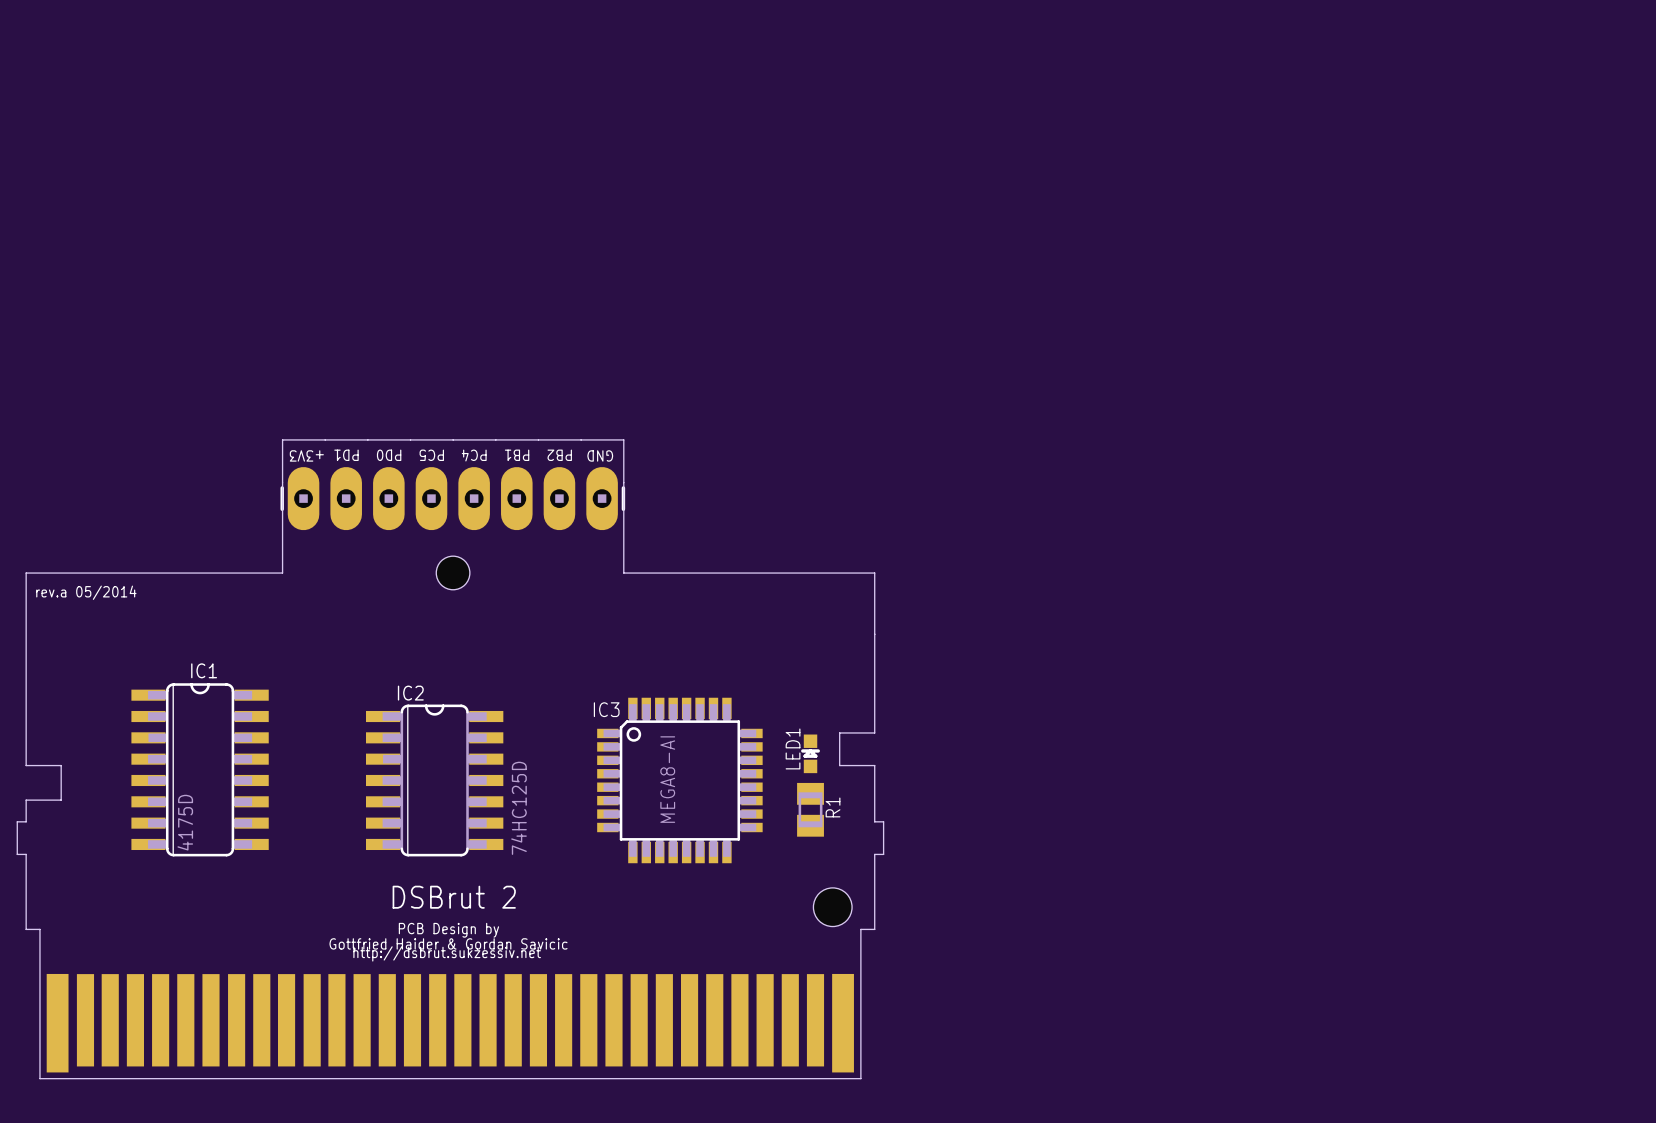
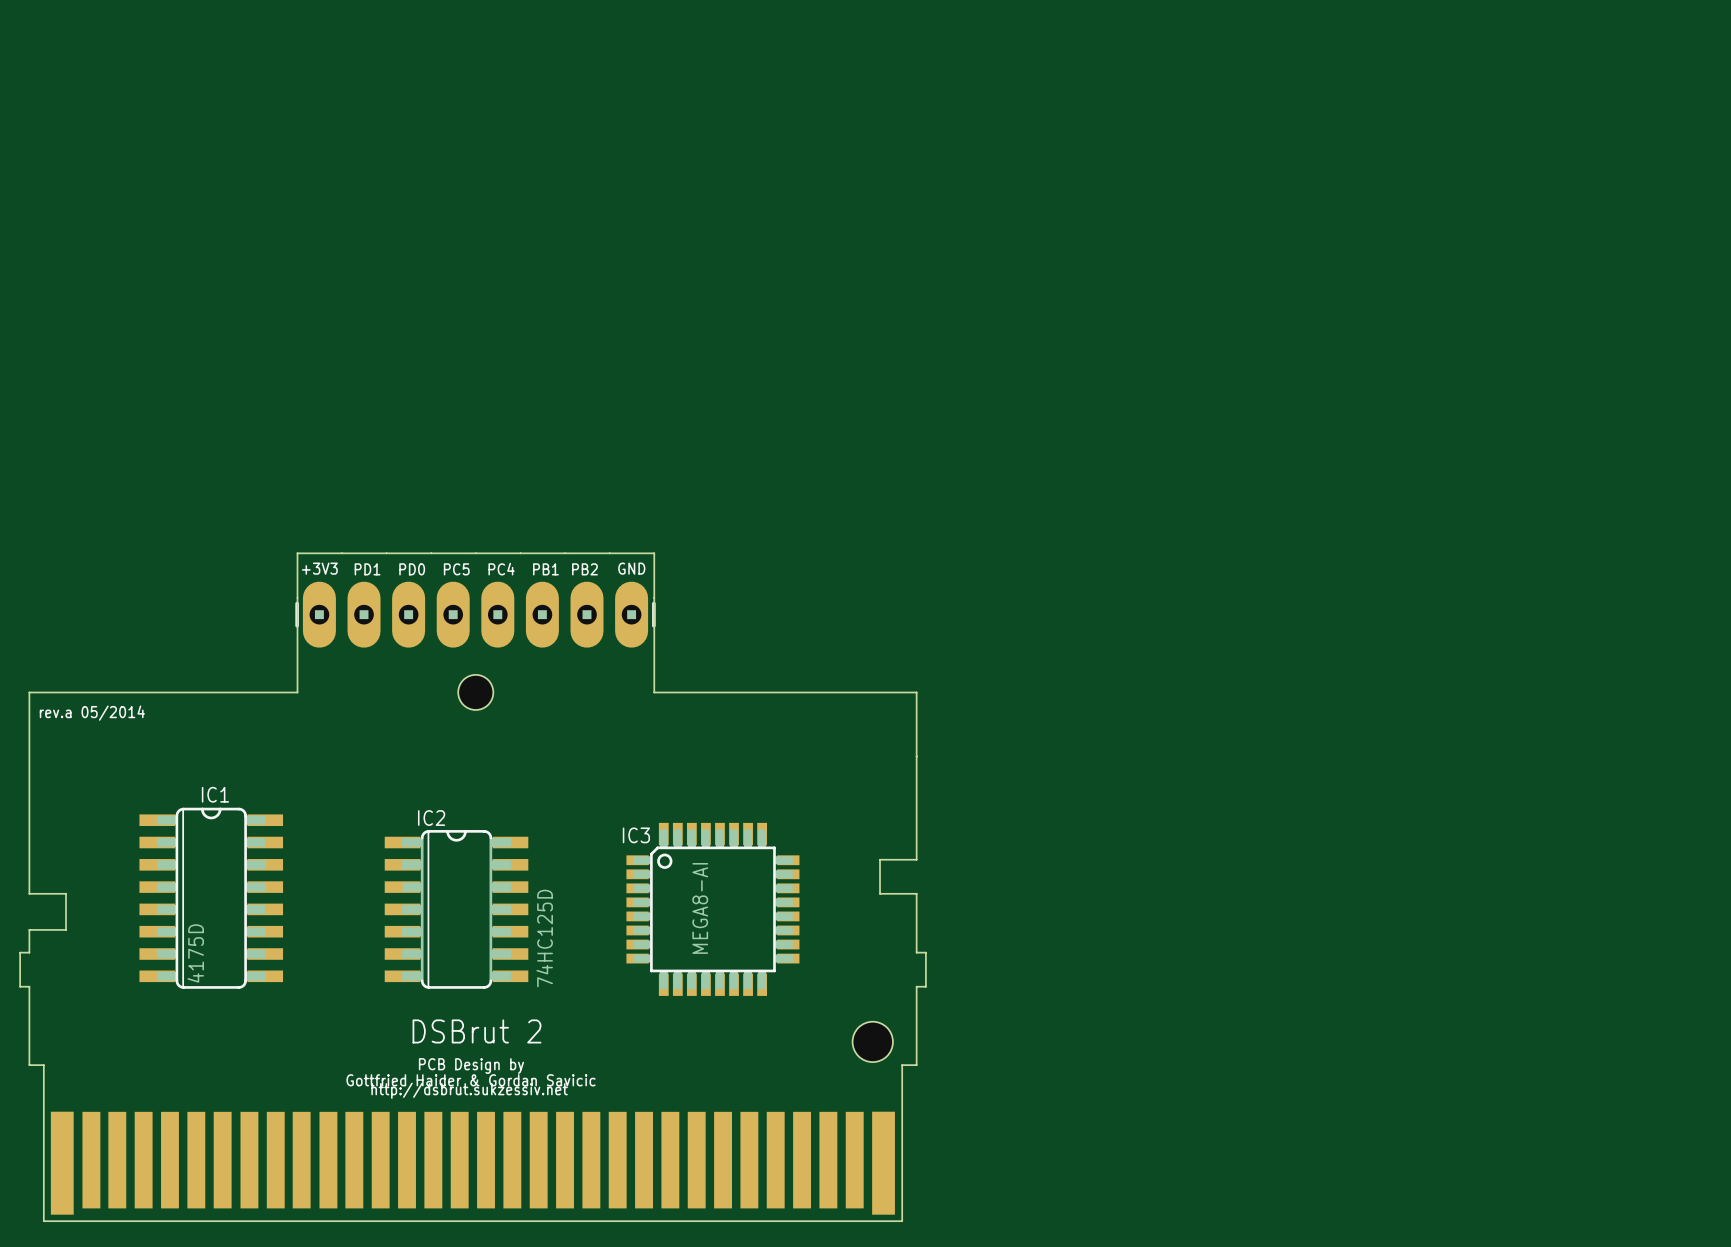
text rotation: 0° (306, 455) -> 180° (319, 568)
text rotation: 0° (346, 455) -> 180° (367, 569)
text rotation: 0° (389, 455) -> 180° (412, 569)
text rotation: 0° (431, 455) -> 180° (456, 569)
text rotation: 0° (474, 455) -> 180° (501, 569)
text rotation: 0° (517, 455) -> 180° (545, 569)
text rotation: 0° (559, 455) -> 180° (584, 569)
text rotation: 0° (600, 455) -> 180° (631, 568)
LED1: (810, 753) -> none
R1: (810, 809) -> none

